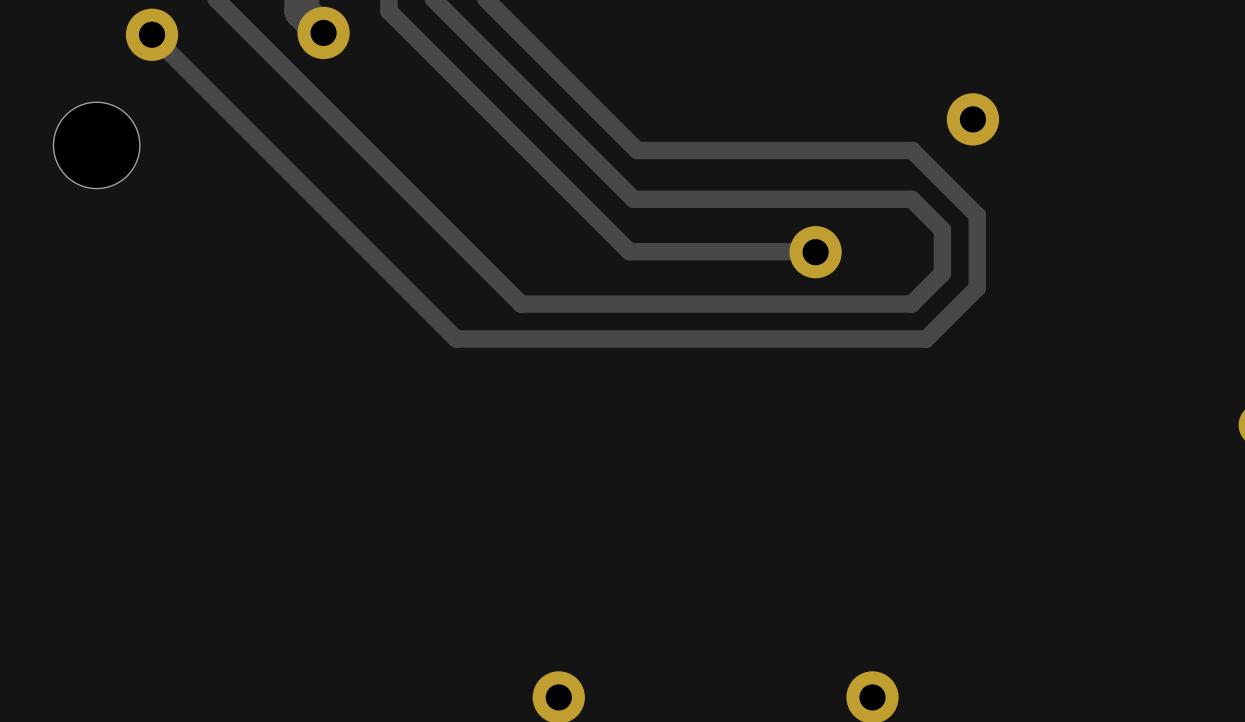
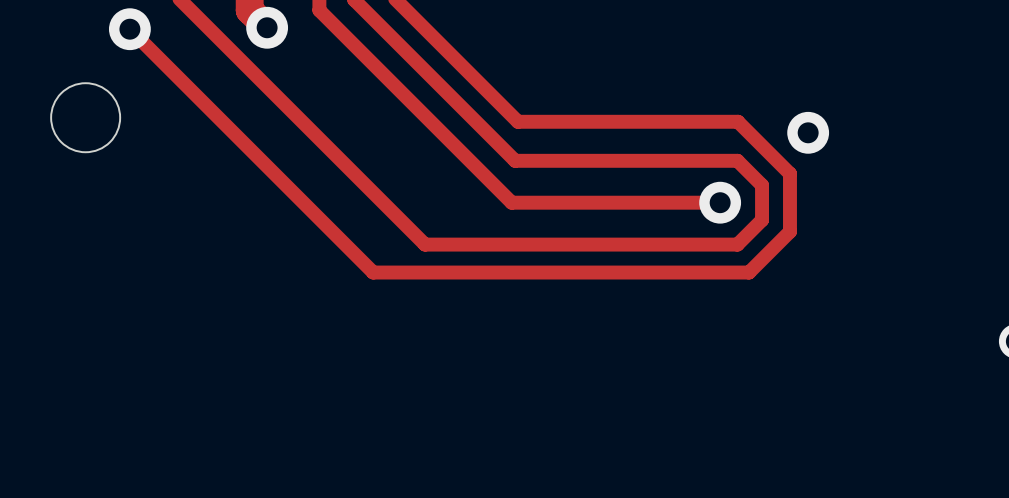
via position: (972, 119) -> (808, 132)
track: none -> (660, 202) (720, 202)
via position: (815, 252) -> (720, 202)

